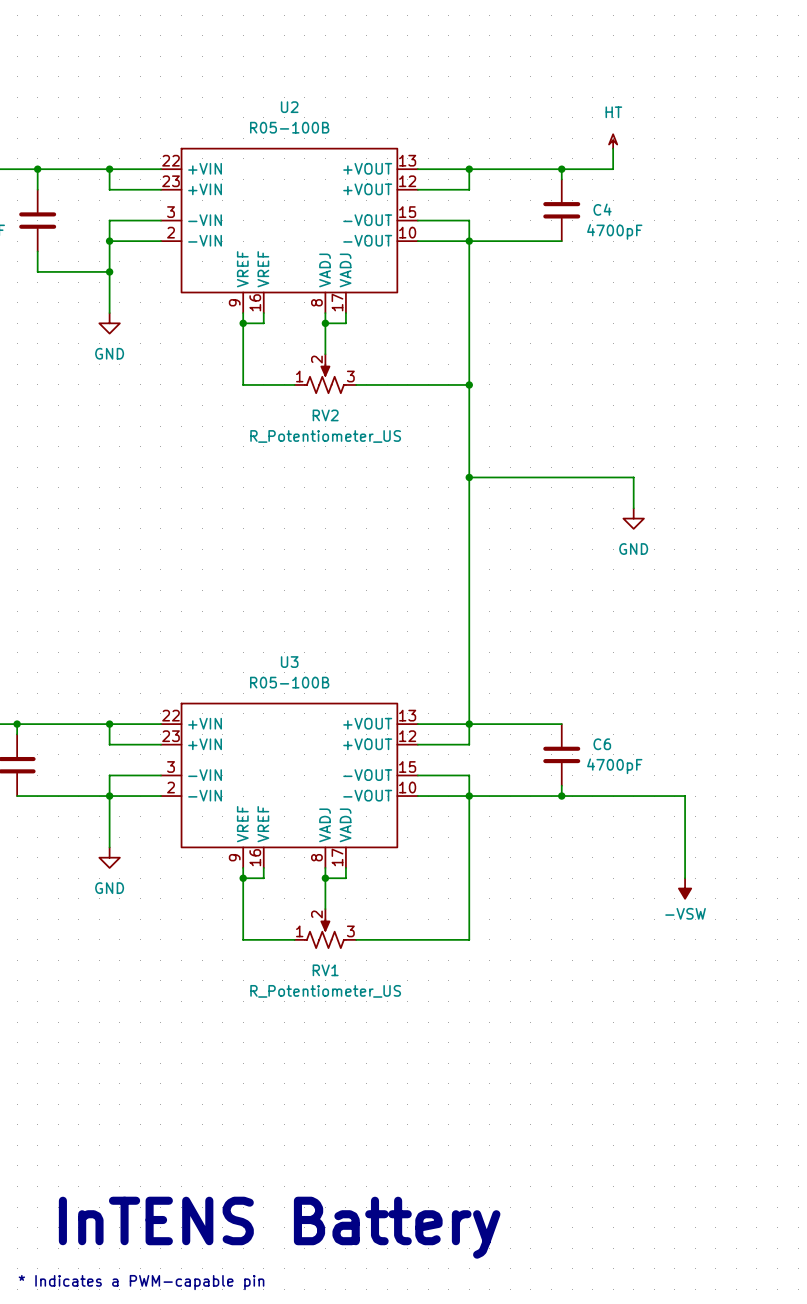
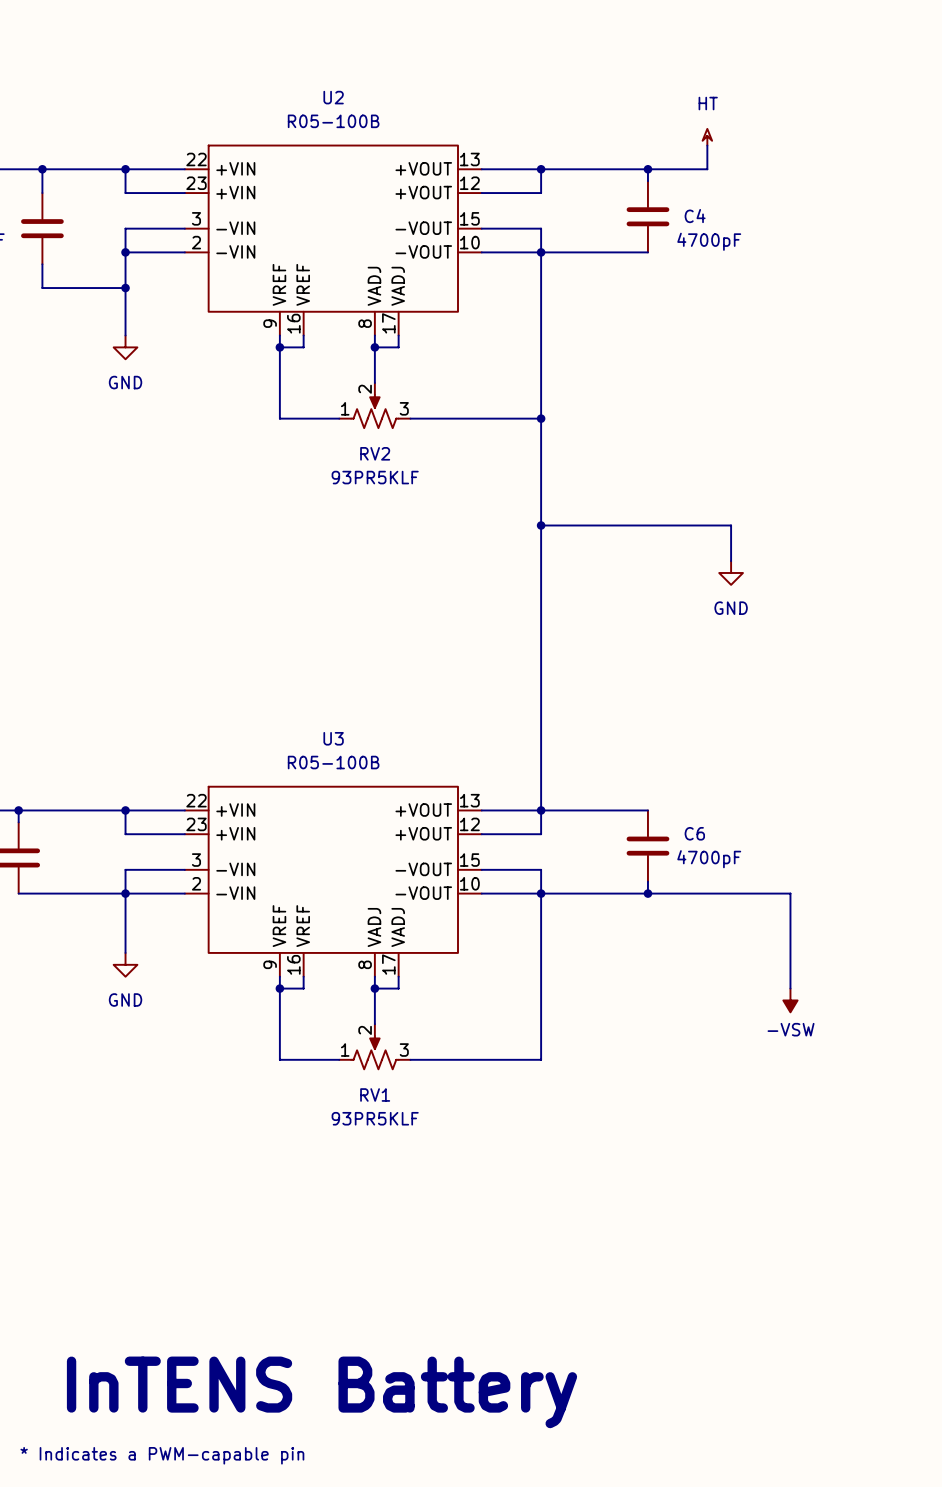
RV2 value: R_Potentiometer_US (325, 436) -> 93PR5KLF (375, 477)
RV1 value: R_Potentiometer_US (325, 991) -> 93PR5KLF (375, 1118)

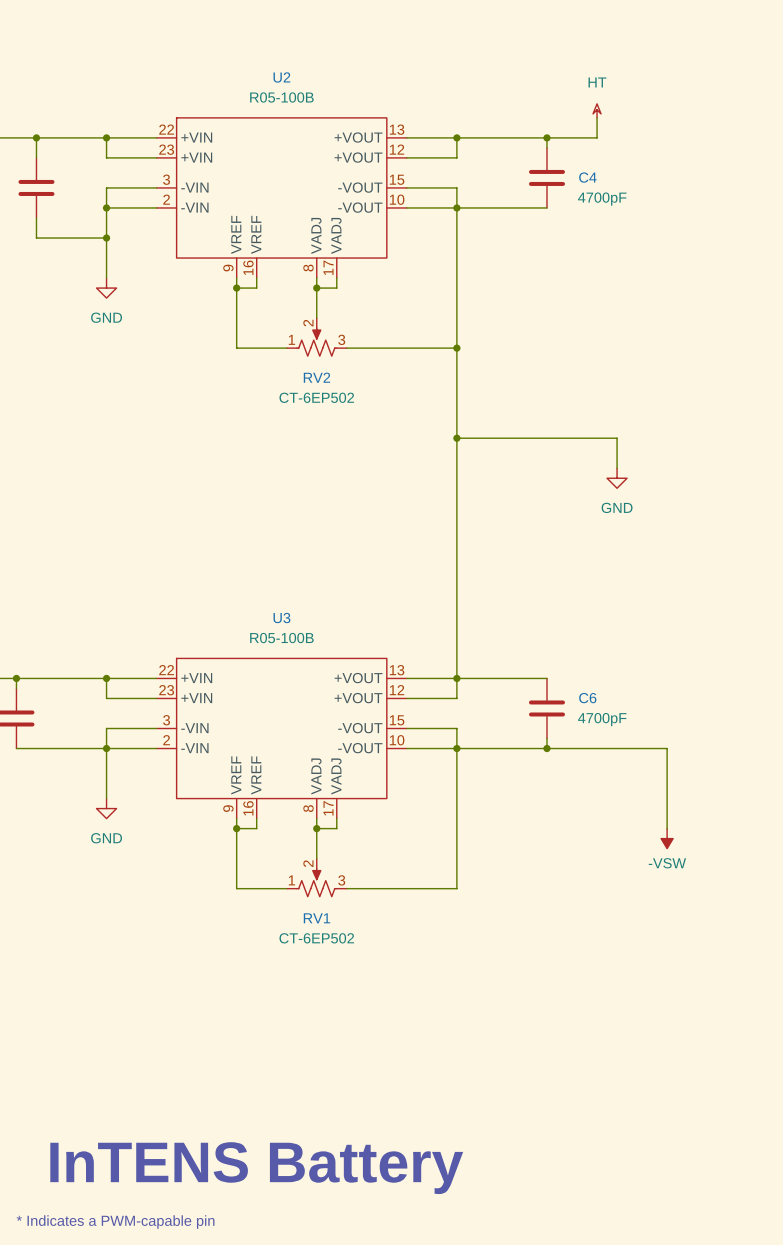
RV2 value: 93PR5KLF (375, 477) -> CT-6EP502 (316, 397)
RV1 value: 93PR5KLF (375, 1118) -> CT-6EP502 (316, 938)

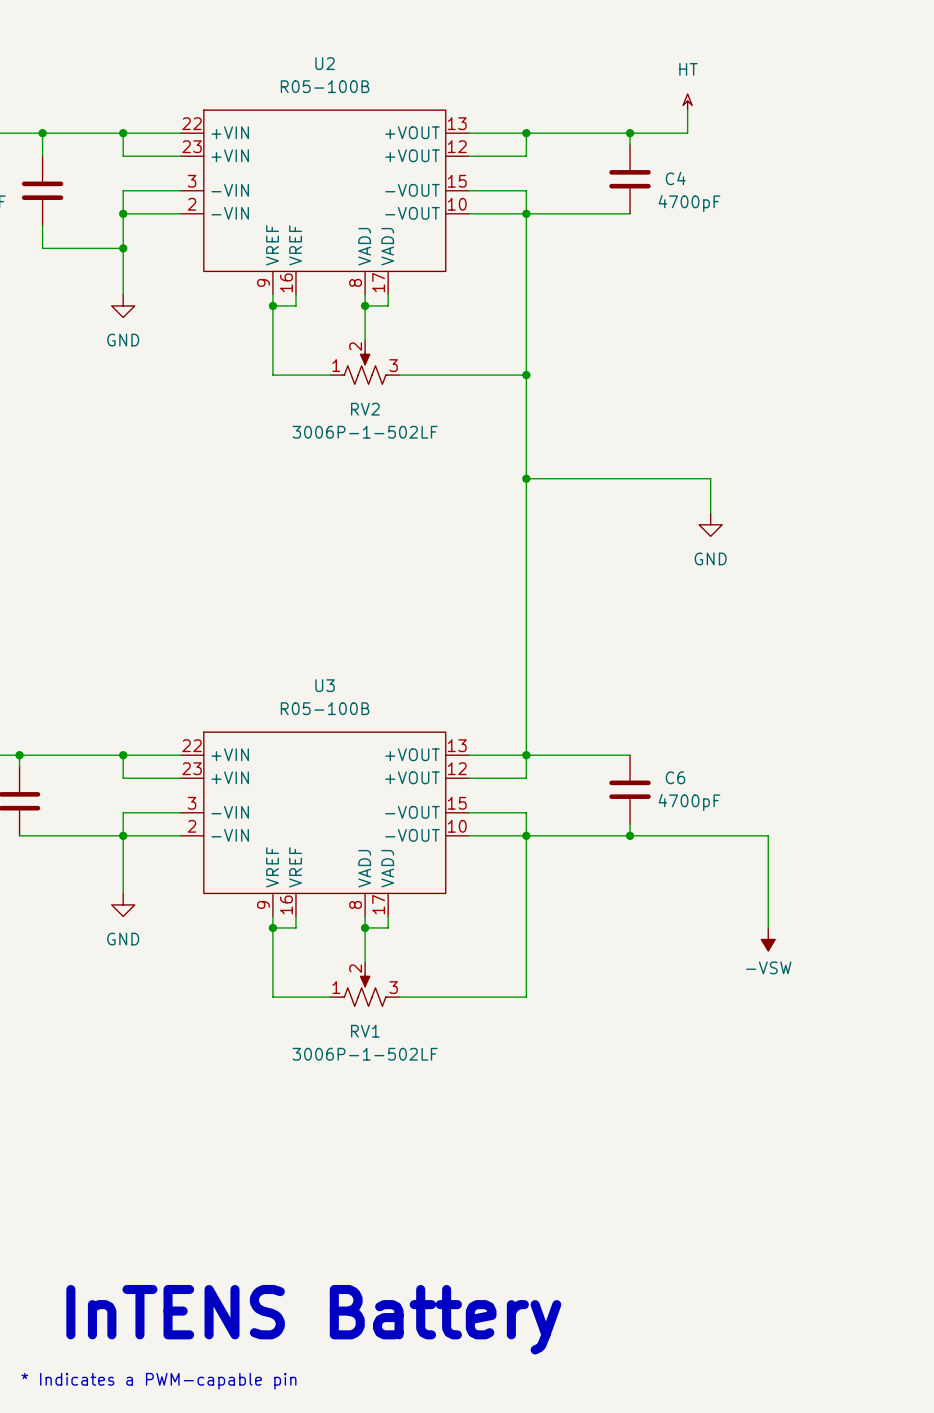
RV2 value: CT-6EP502 (316, 397) -> 3006P-1-502LF (365, 432)
RV1 value: CT-6EP502 (316, 938) -> 3006P-1-502LF (365, 1054)

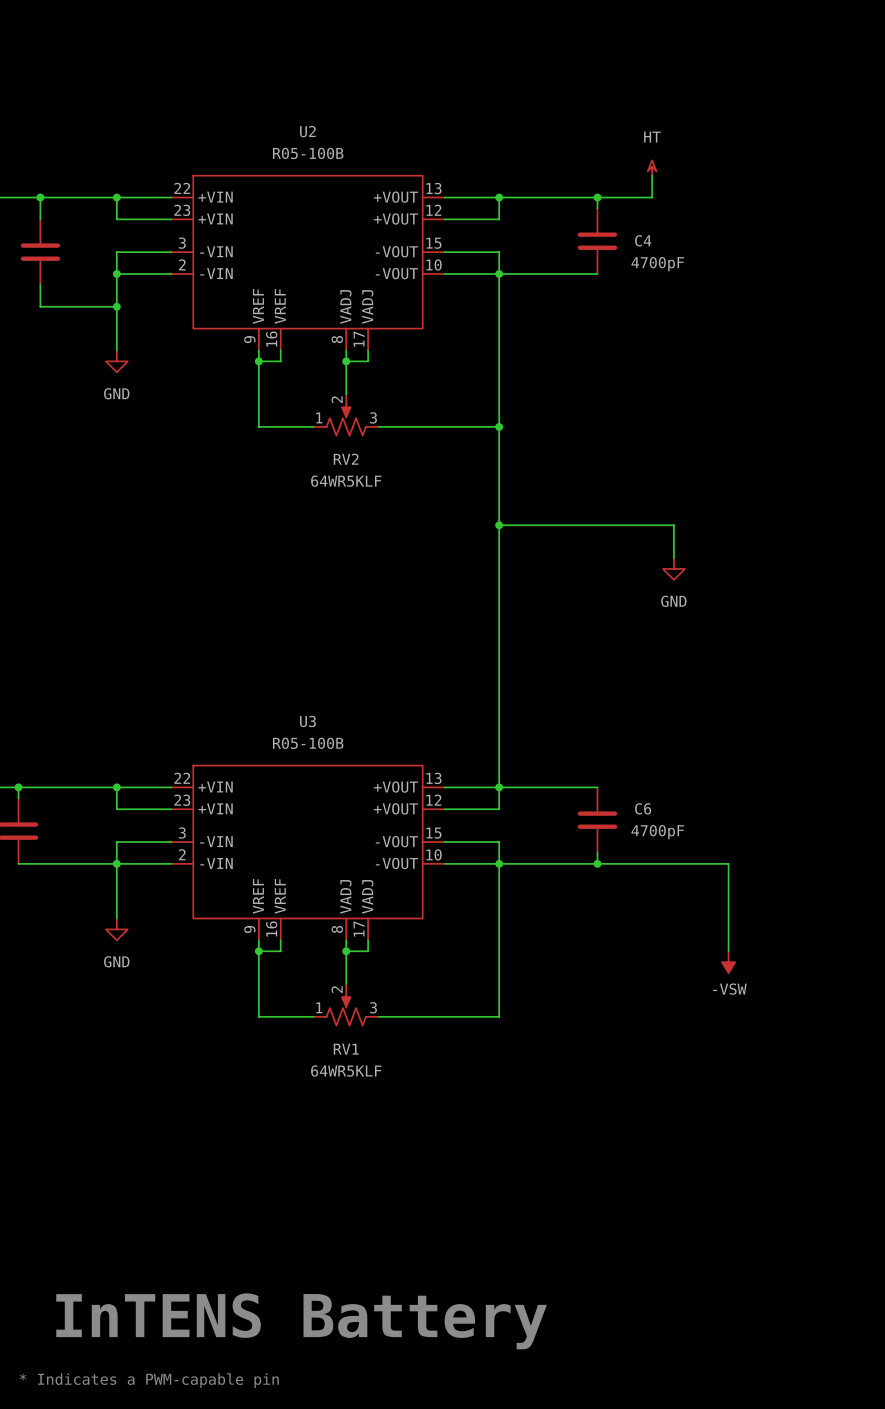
RV2 value: 3006P-1-502LF (365, 432) -> 64WR5KLF (346, 481)
RV1 value: 3006P-1-502LF (365, 1054) -> 64WR5KLF (346, 1071)

